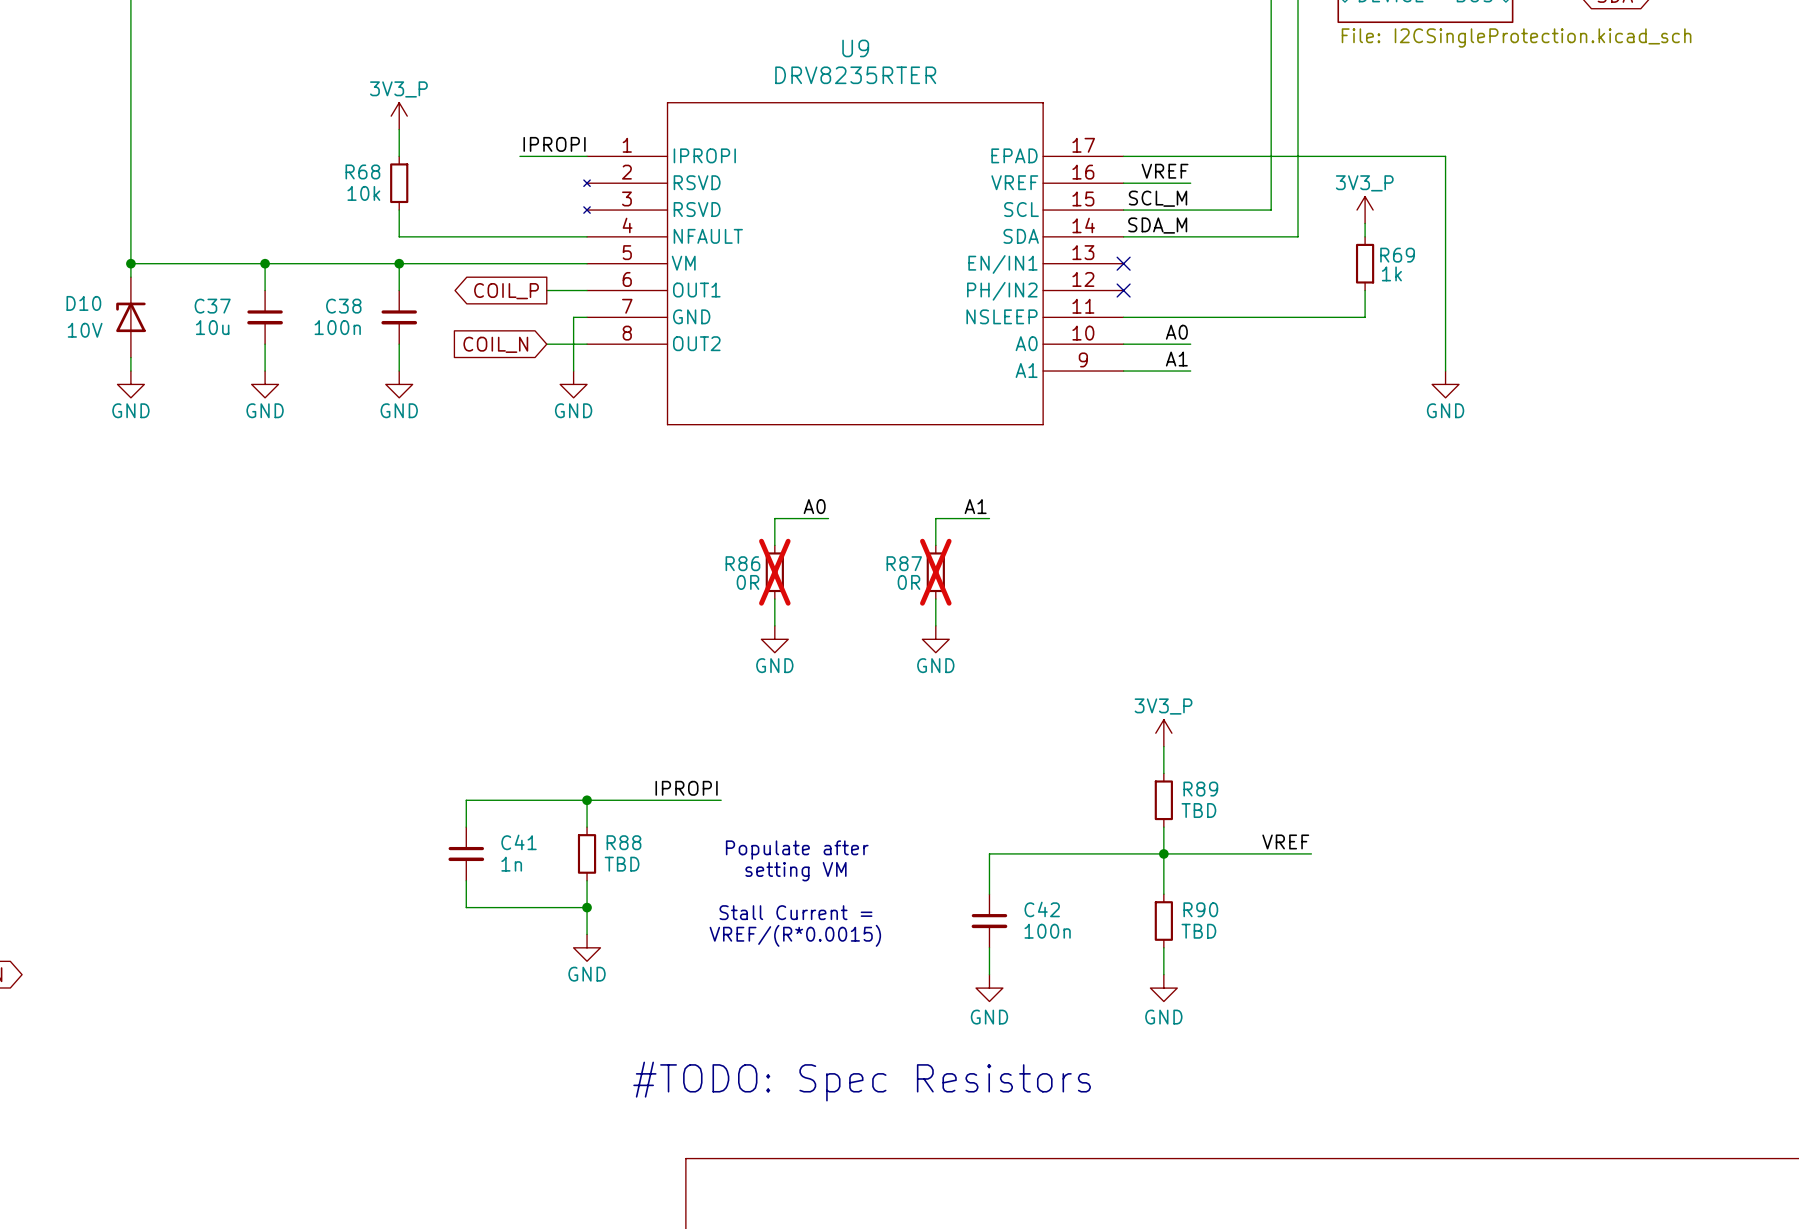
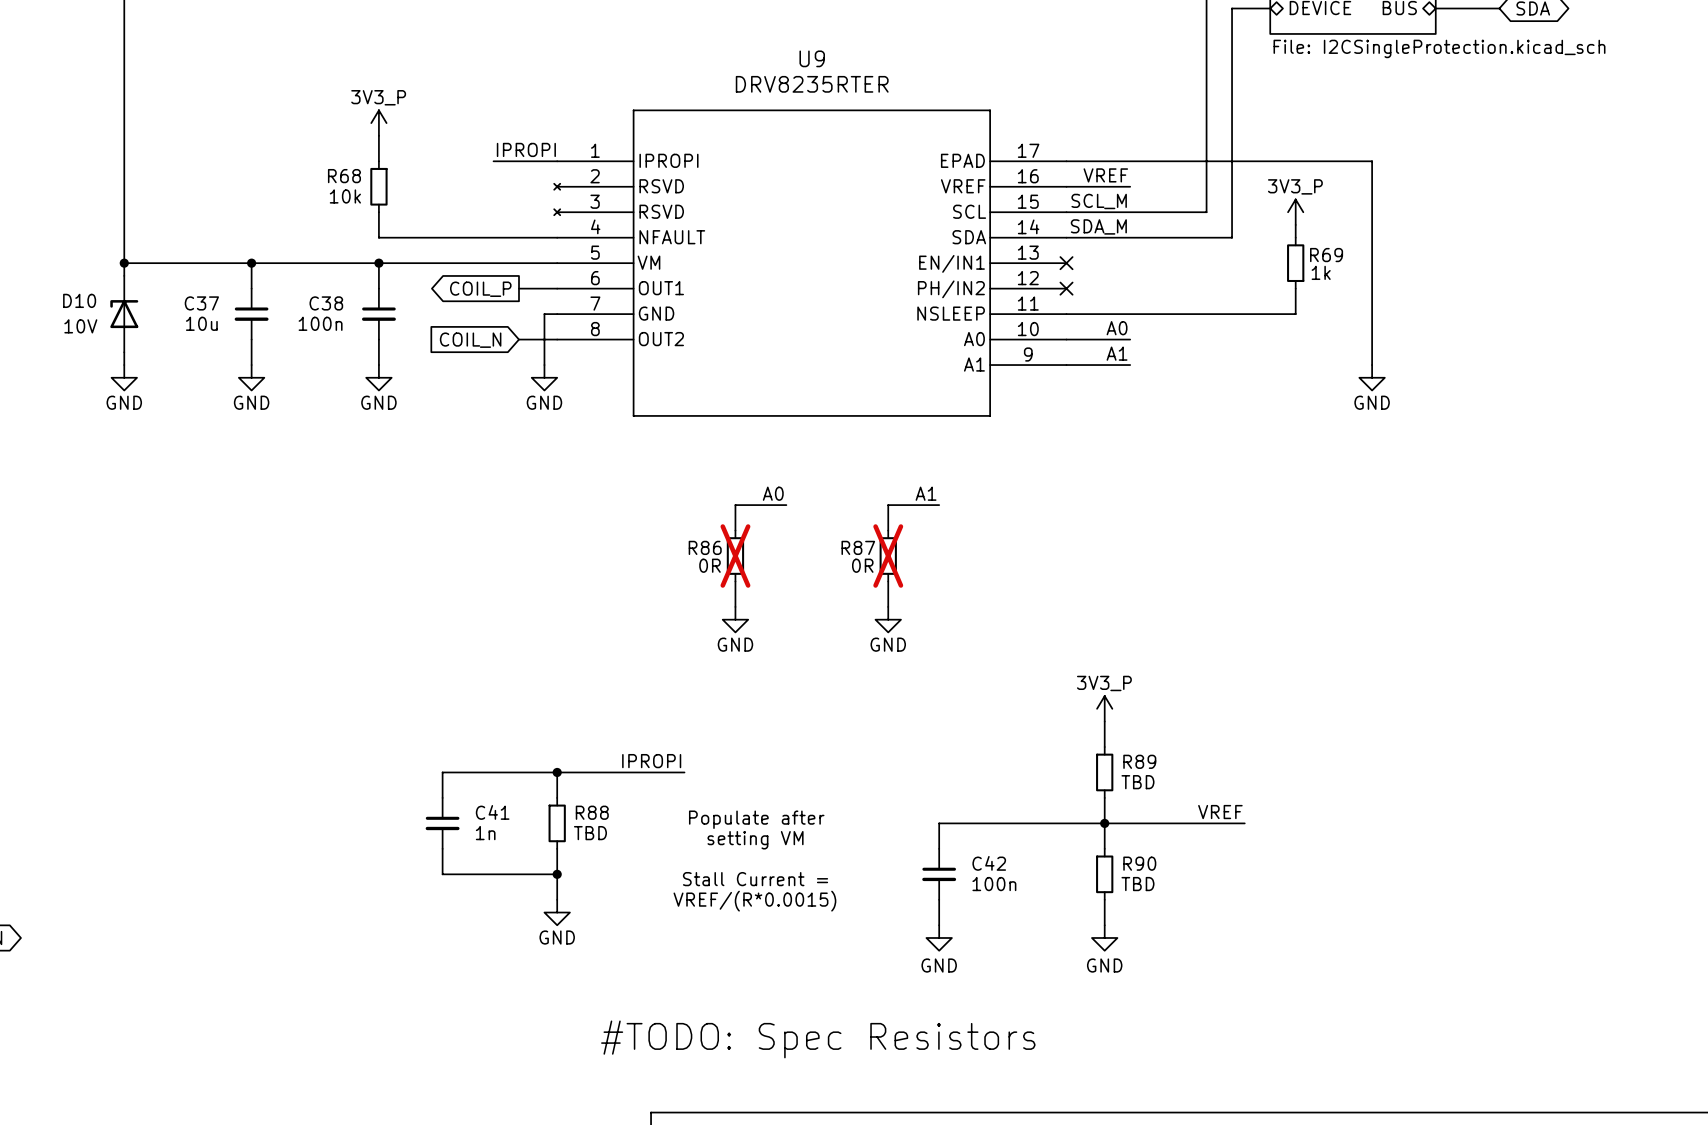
C42 position: (989, 921) -> (939, 874)
R90 position: (1163, 921) -> (1104, 874)
power symbol position: GND (989, 988) -> GND (939, 937)
power symbol position: GND (1163, 988) -> GND (1104, 937)

